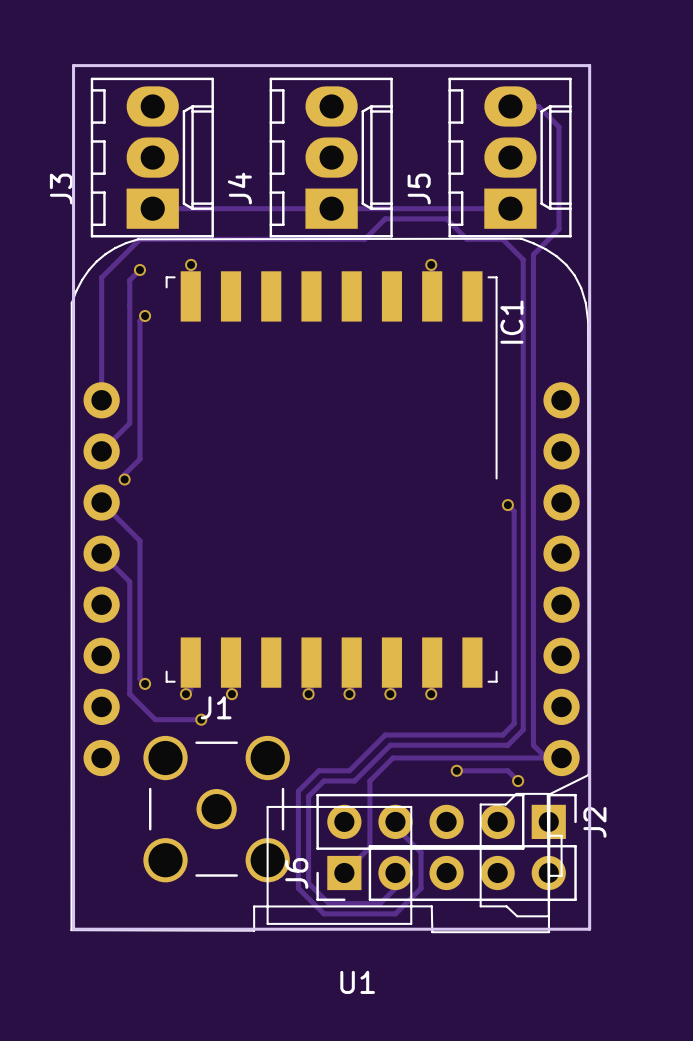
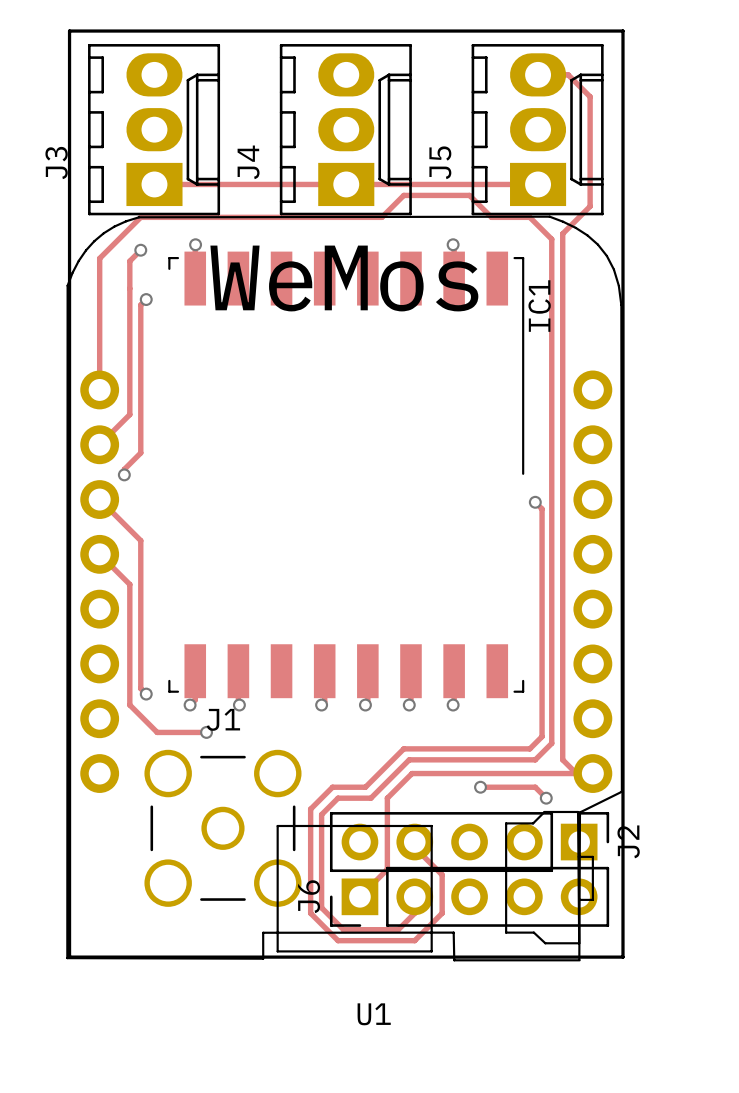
U1 text: none -> WeMos (344, 278)

